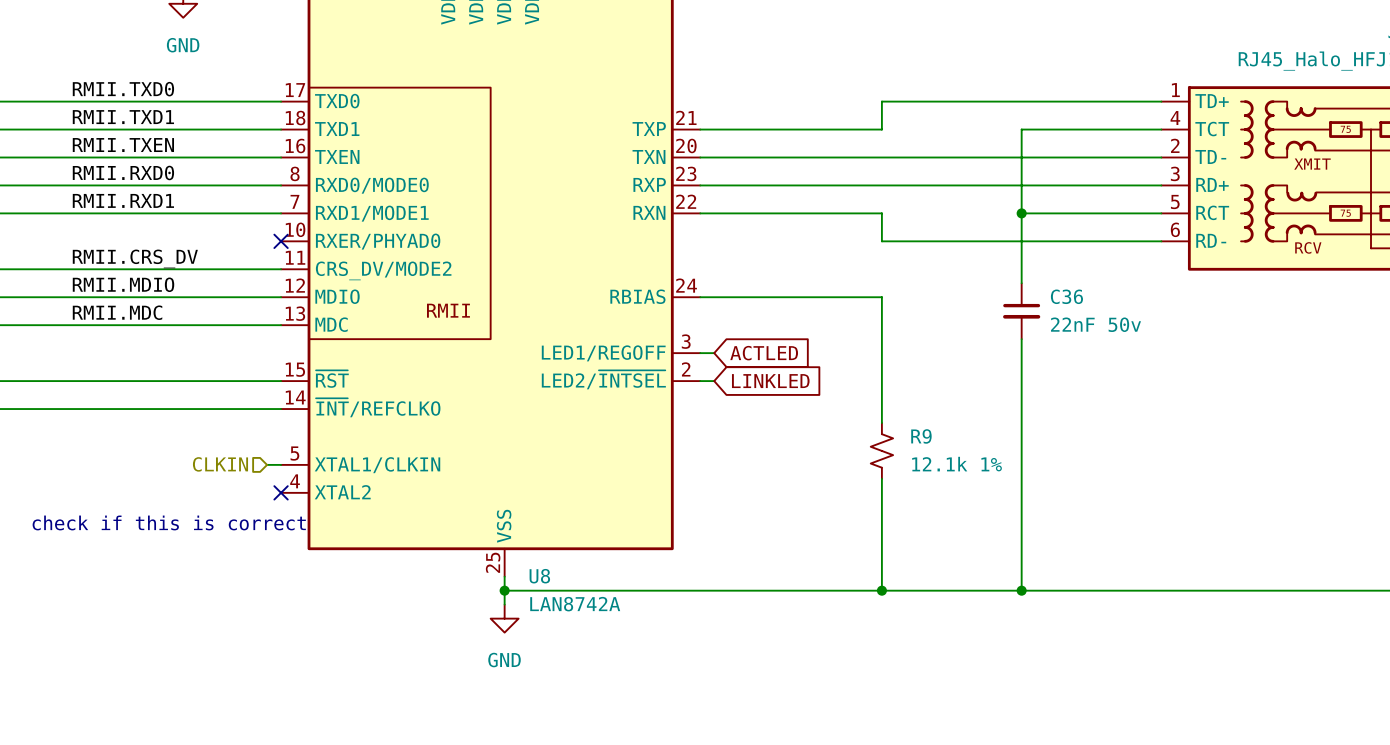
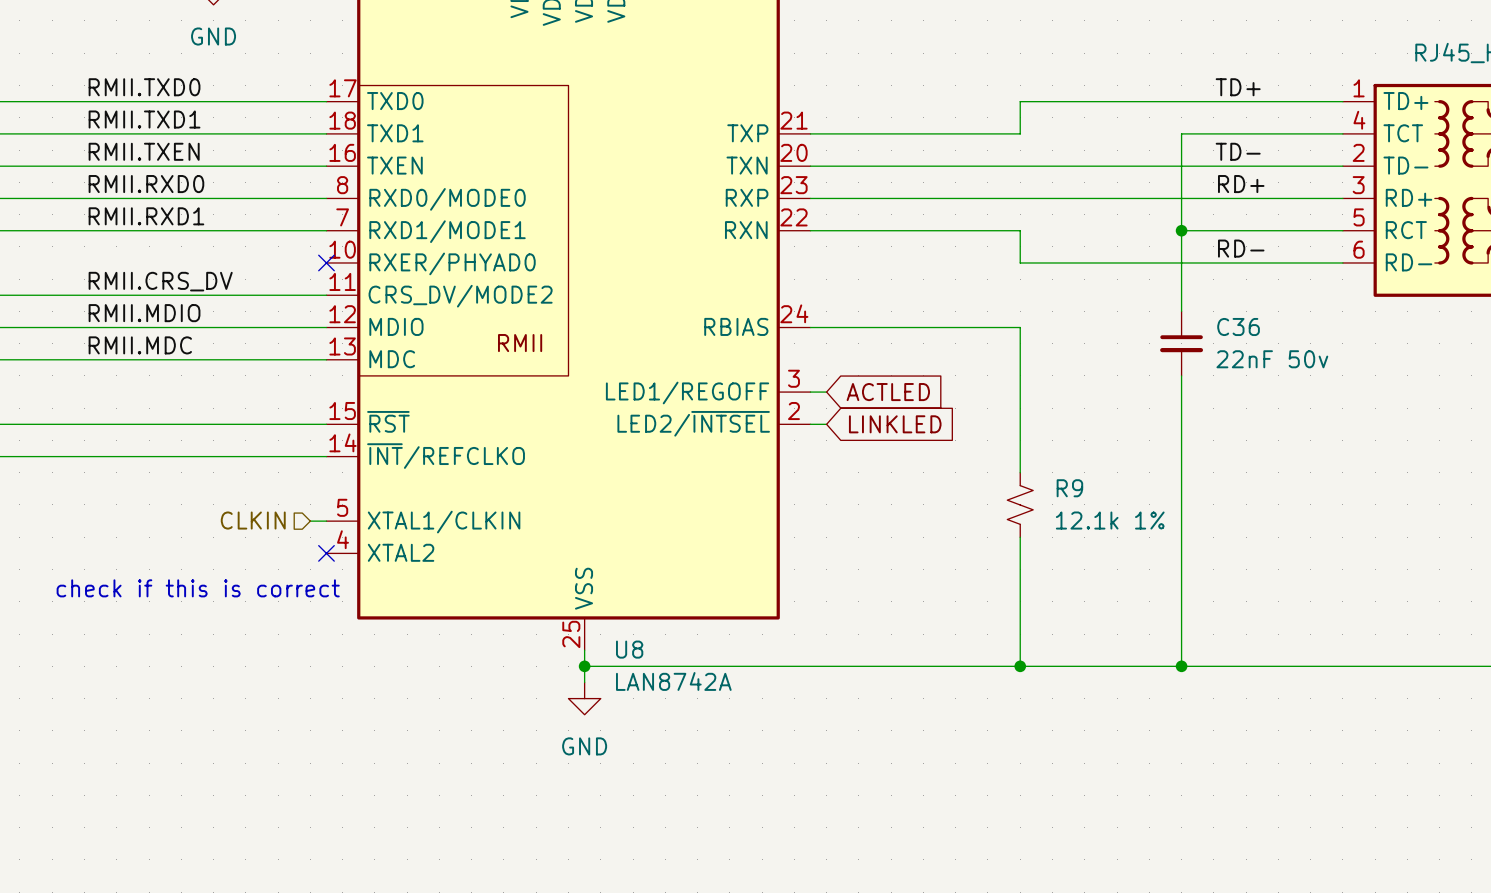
label: none -> TD+ (1238, 87)
label: none -> TD- (1238, 151)
label: none -> RD+ (1241, 184)
label: none -> RD- (1241, 248)

